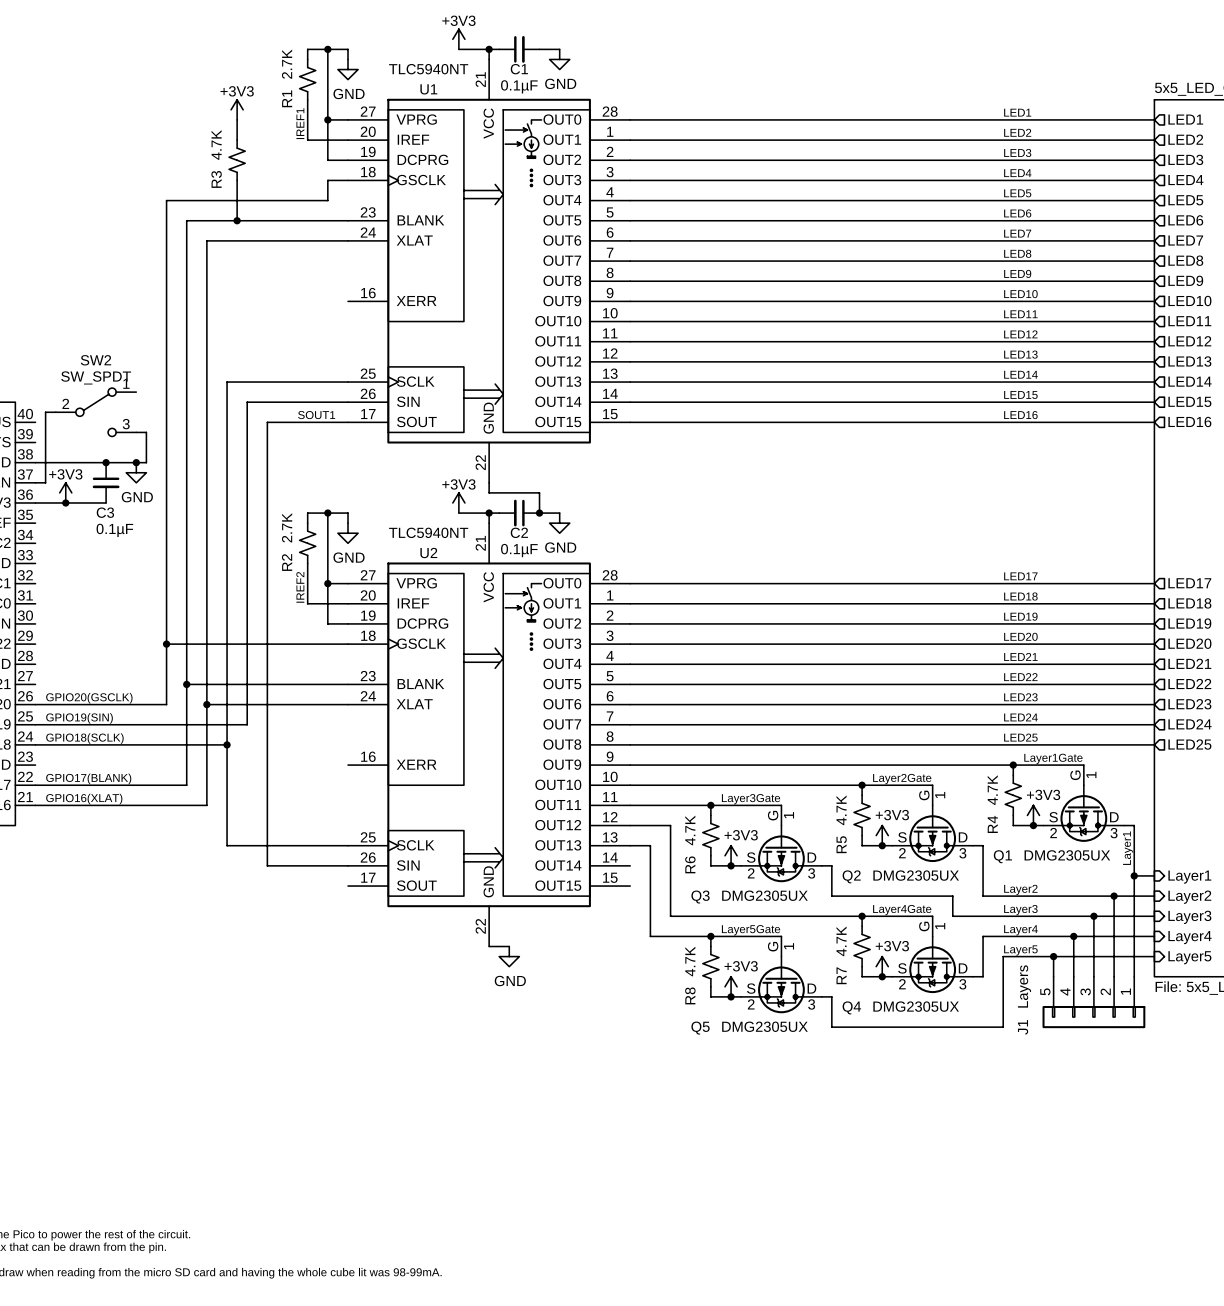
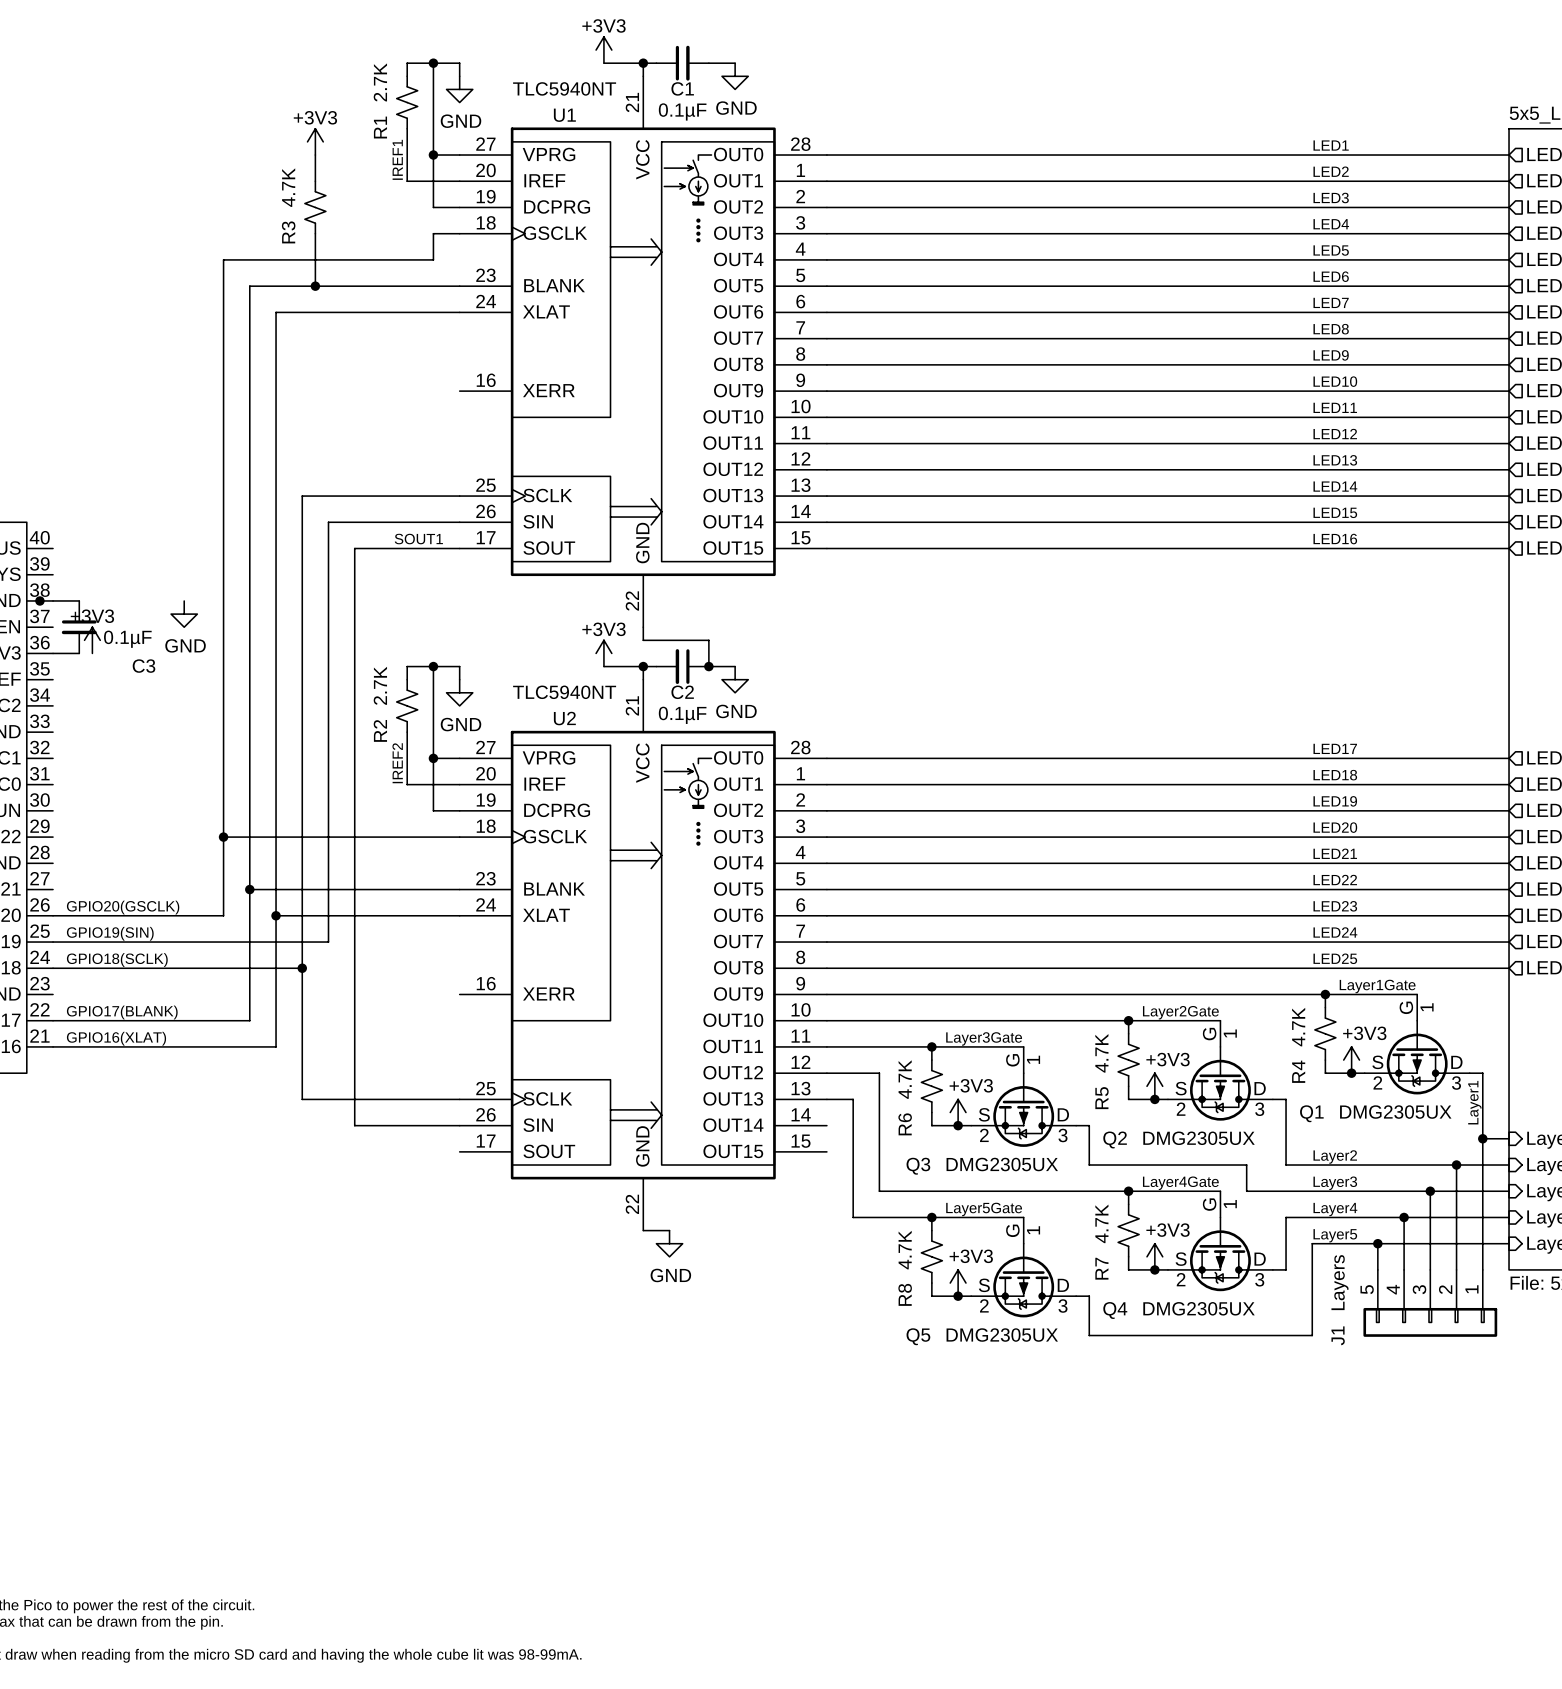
wire: (55, 412) (45, 412) (45, 482) (35, 482) -> none
SW2: SW_SPDT (96, 412) -> none
wire: (136, 432) (146, 432) (146, 462) (55, 462) -> none
junction: none -> (39, 600)
junction: (106, 462) -> none
junction: (136, 462) -> none
C3 position: (106, 482) -> (79, 627)
wire: (55, 502) (106, 502) -> none
junction: (65, 502) -> none
C3 value position: 0.1µF (114, 530) -> 0.1µF (127, 639)

